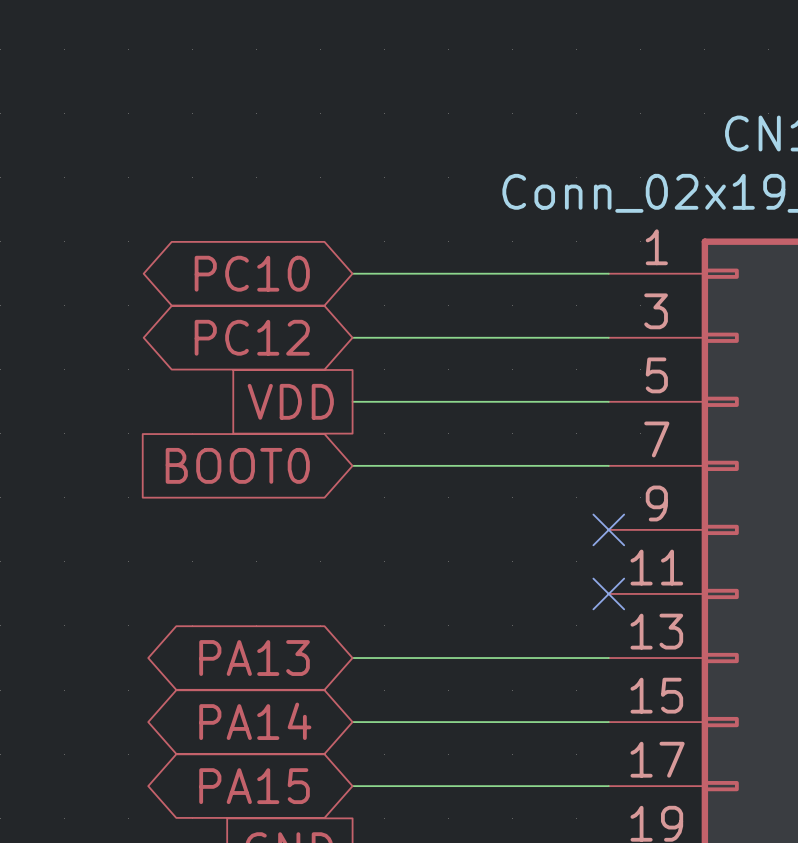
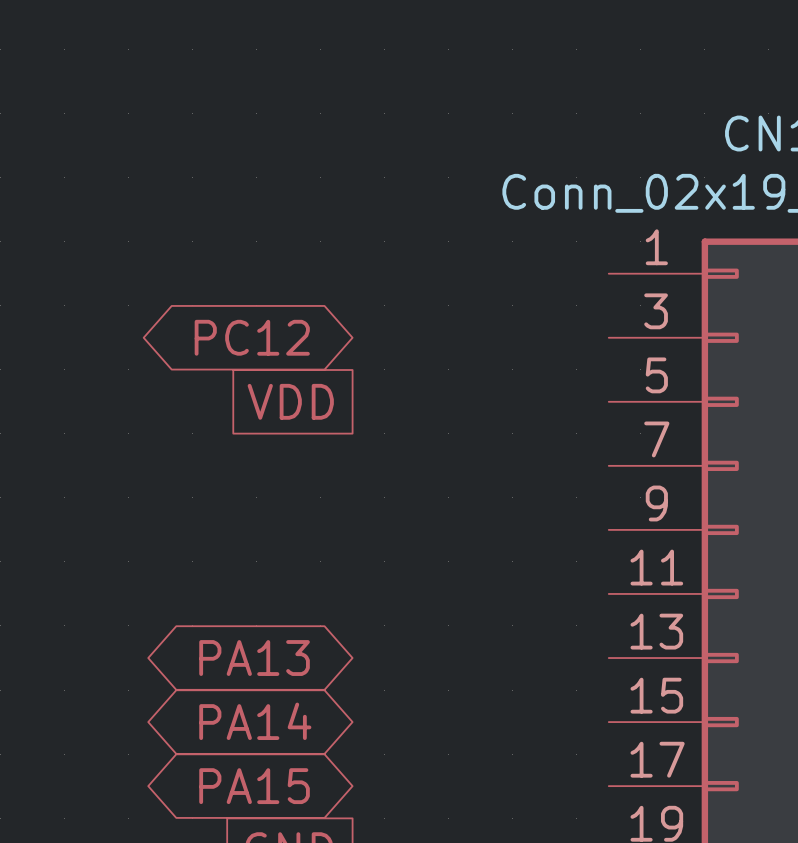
global label: PC10 (252, 273) -> none
wire: (352, 273) (608, 273) -> none
wire: (352, 337) (608, 337) -> none
wire: (352, 401) (608, 401) -> none
global label: BOOT0 (237, 465) -> none
wire: (352, 465) (608, 465) -> none
no-connect mark: (608, 529) -> none
no-connect mark: (608, 593) -> none
wire: (352, 658) (608, 658) -> none
wire: (352, 722) (608, 722) -> none
wire: (352, 786) (608, 786) -> none

